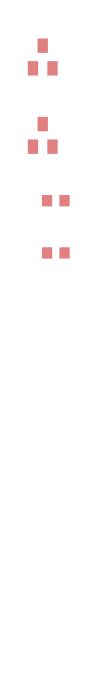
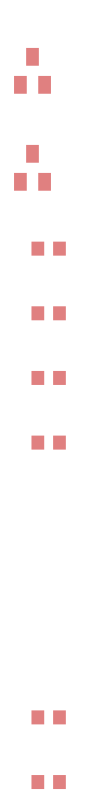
part: none -> (48, 377)
part: none -> (48, 442)
part: none -> (48, 717)
part: none -> (48, 782)

